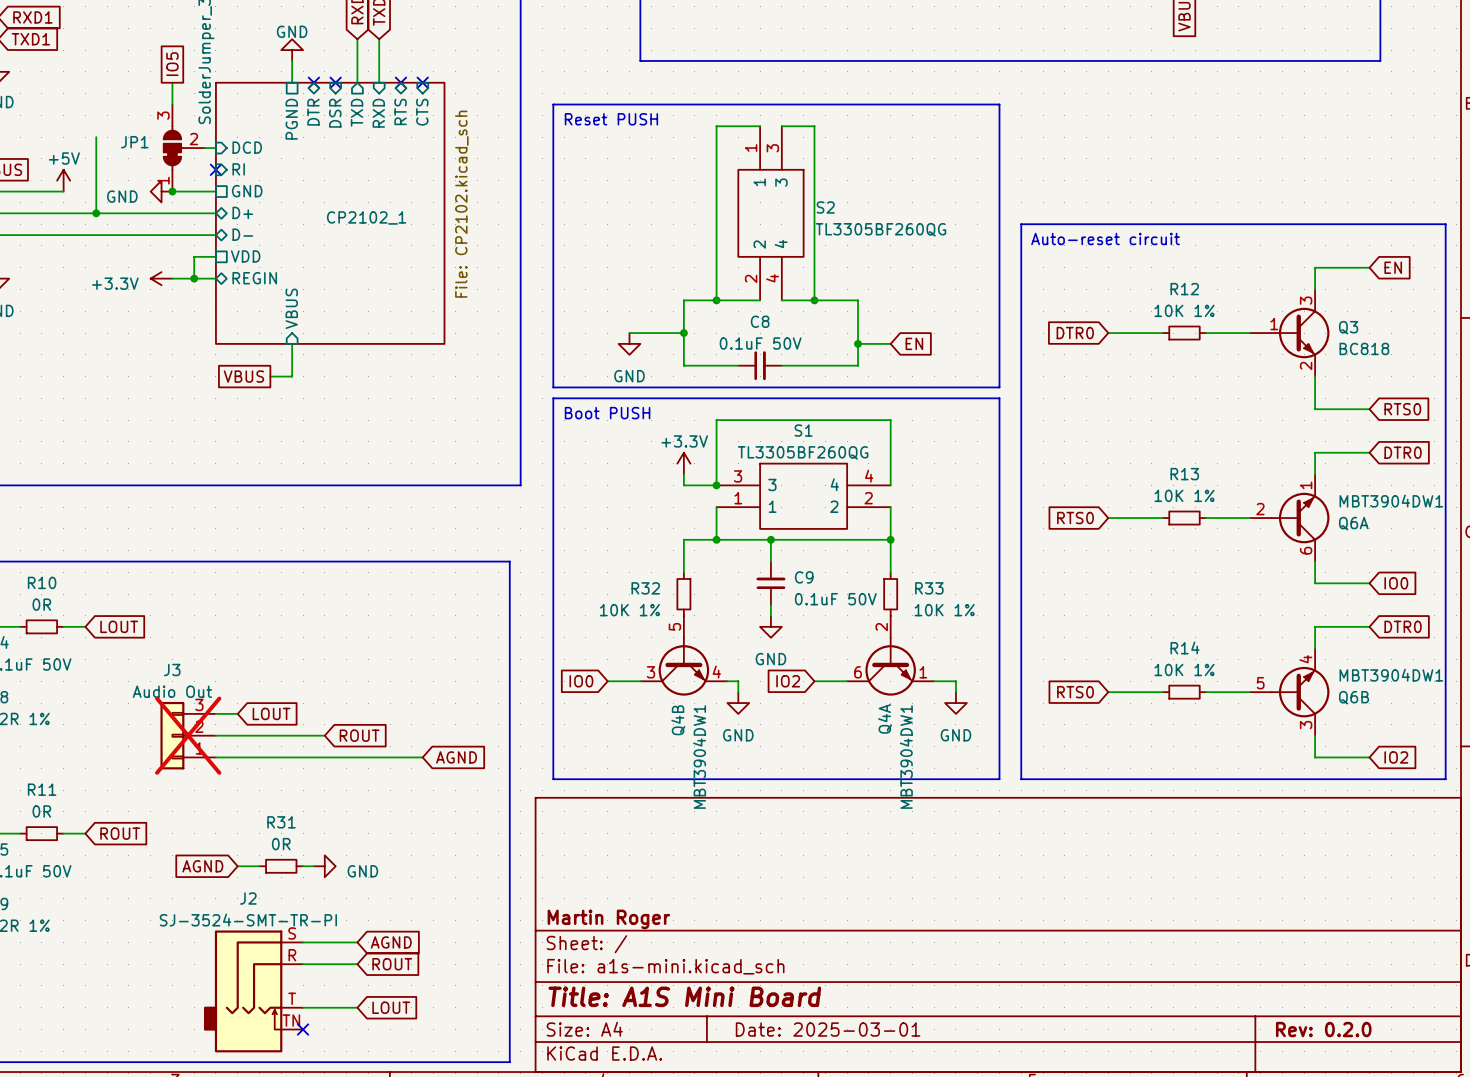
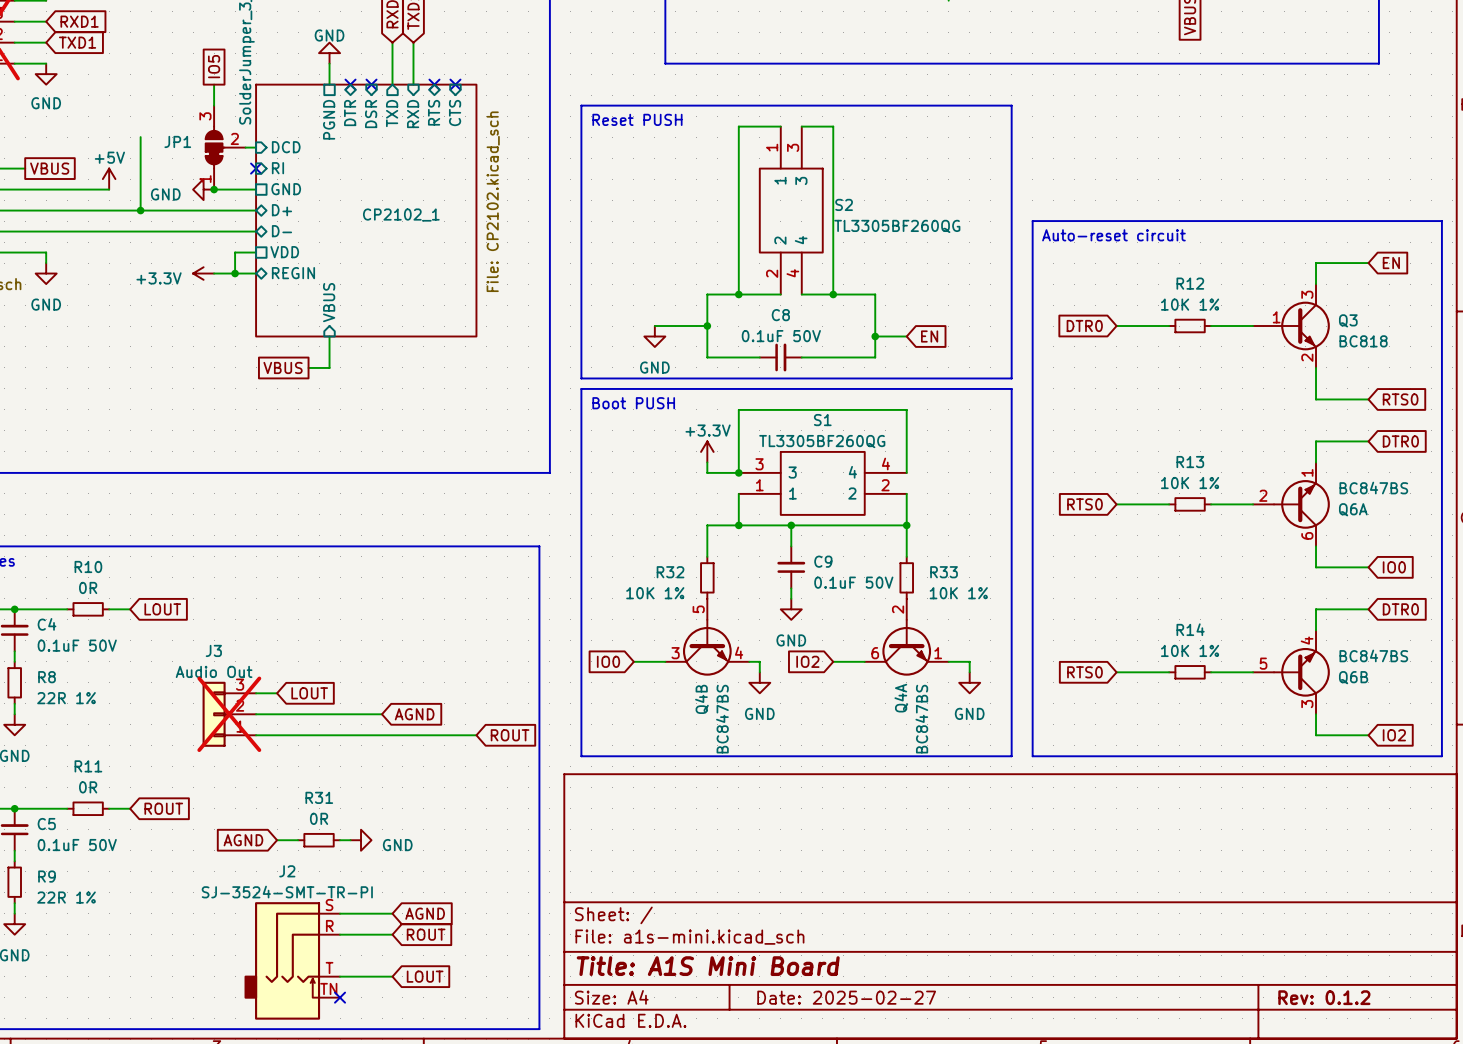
Q6A value: MBT3904DW1 (1391, 501) -> BC847BS (1373, 488)
Q6B value: MBT3904DW1 (1391, 675) -> BC847BS (1373, 655)
wire: none -> (361, 714) (382, 714)
global label position: ROUT (359, 735) -> ROUT (510, 735)
wire: none -> (455, 735) (476, 735)
global label position: AGND (456, 757) -> AGND (414, 714)
Q4B value: MBT3904DW1 (699, 757) -> BC847BS (722, 719)
Q4A value: MBT3904DW1 (906, 757) -> BC847BS (921, 719)
title block: Martin Roger (608, 919) -> none
title block: Date: 2025-03-01 (828, 1029) -> Date: 2025-02-27 (846, 997)
title block: Rev: 0.2.0 (1323, 1029) -> Rev: 0.1.2 (1324, 997)

